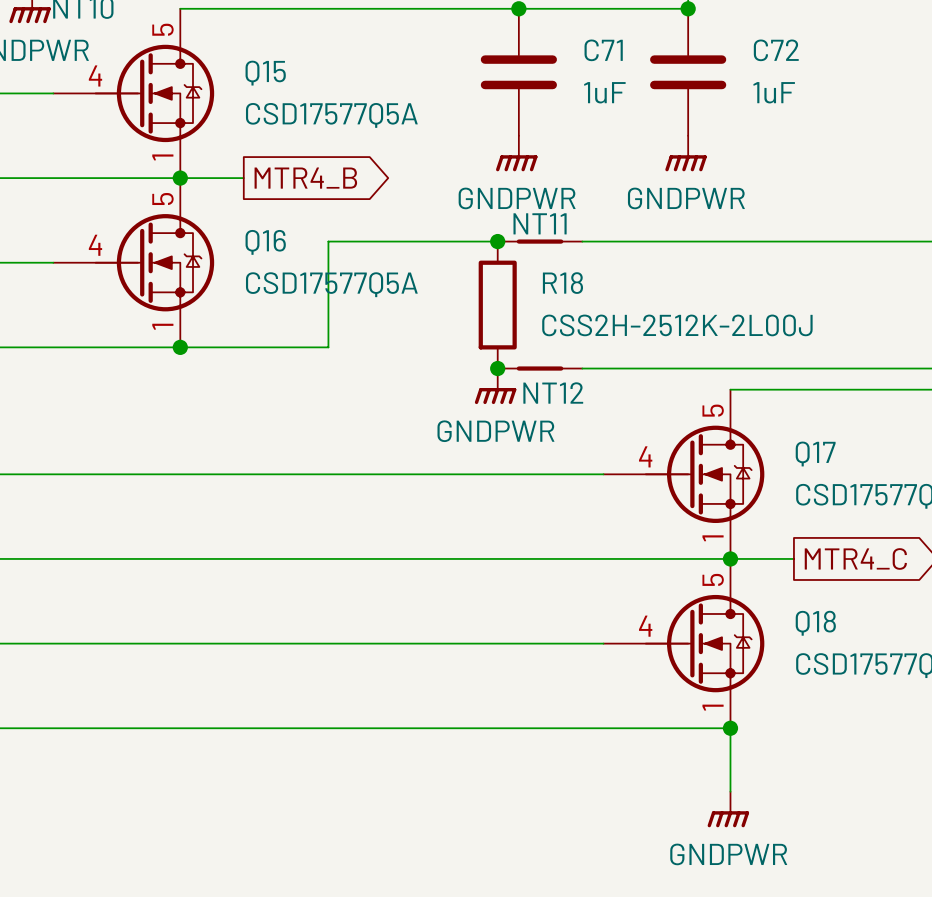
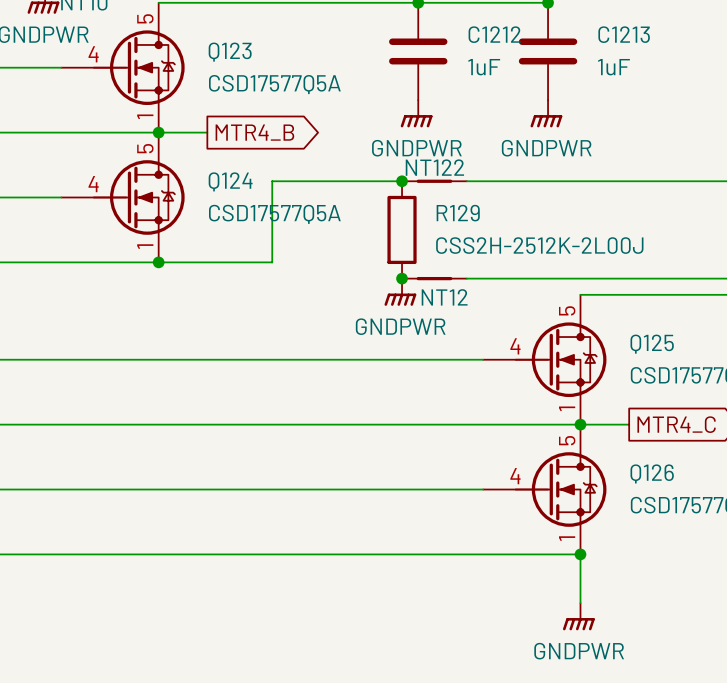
C71 name: C71 (603, 50) -> C1212 (494, 34)
C72 name: C72 (776, 50) -> C1213 (624, 34)
Q15 name: Q15 (265, 73) -> Q123 (230, 52)
NT11 name: NT11 (540, 223) -> NT122 (434, 167)
Q16 name: Q16 (265, 242) -> Q124 (230, 181)
R18 name: R18 (562, 283) -> R129 (458, 213)
Q17 name: Q17 (815, 453) -> Q125 (652, 344)
Q18 name: Q18 (815, 623) -> Q126 (652, 473)

